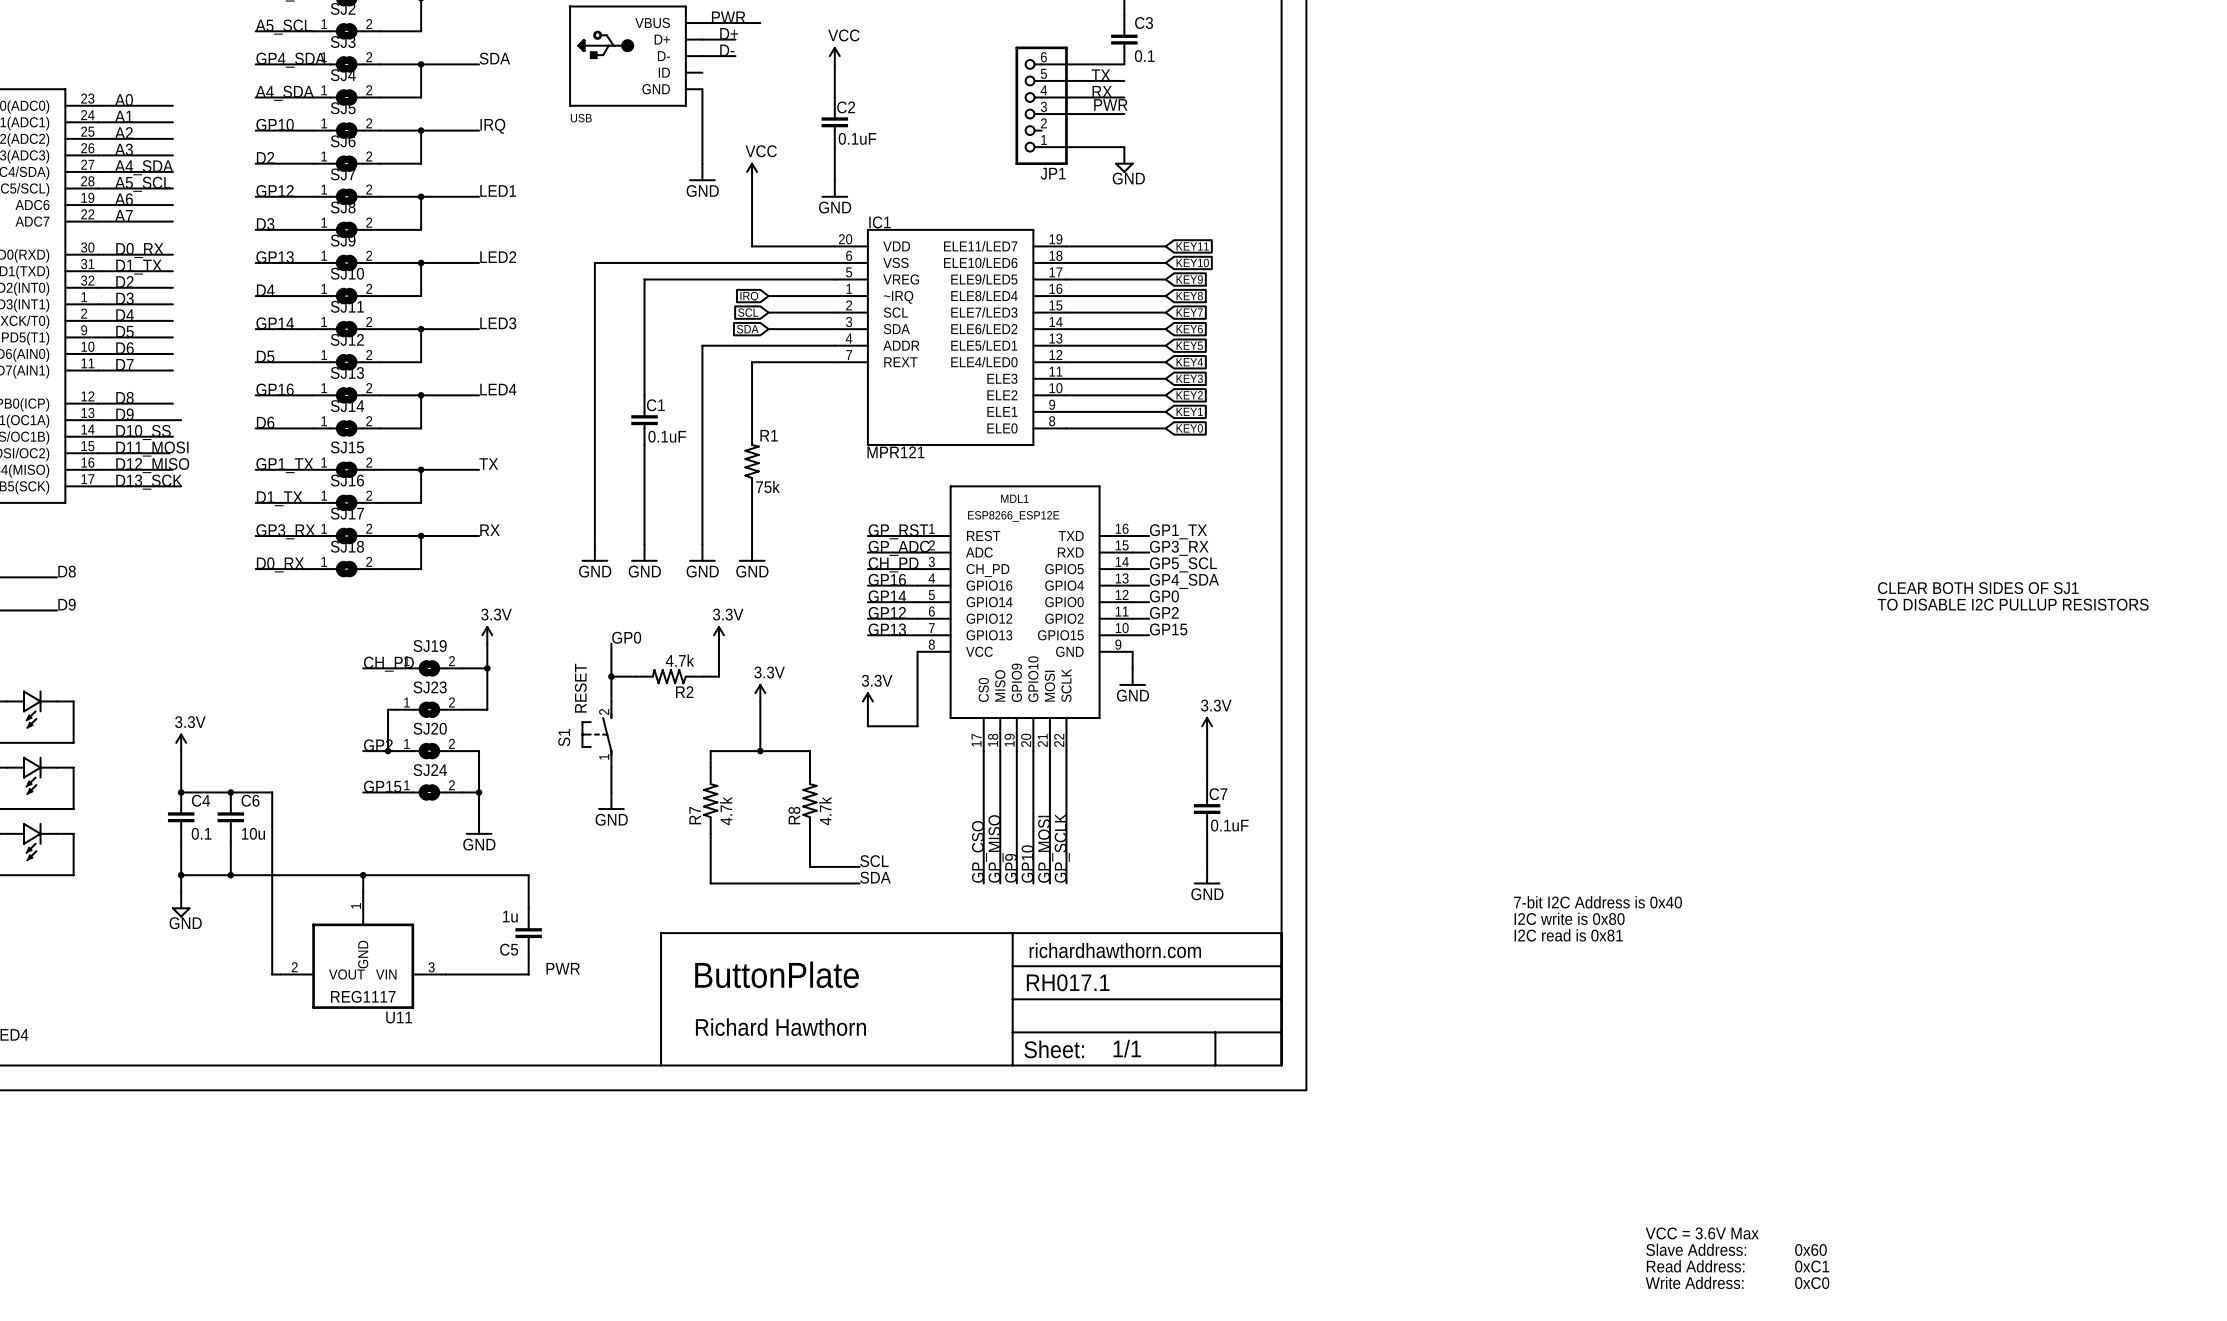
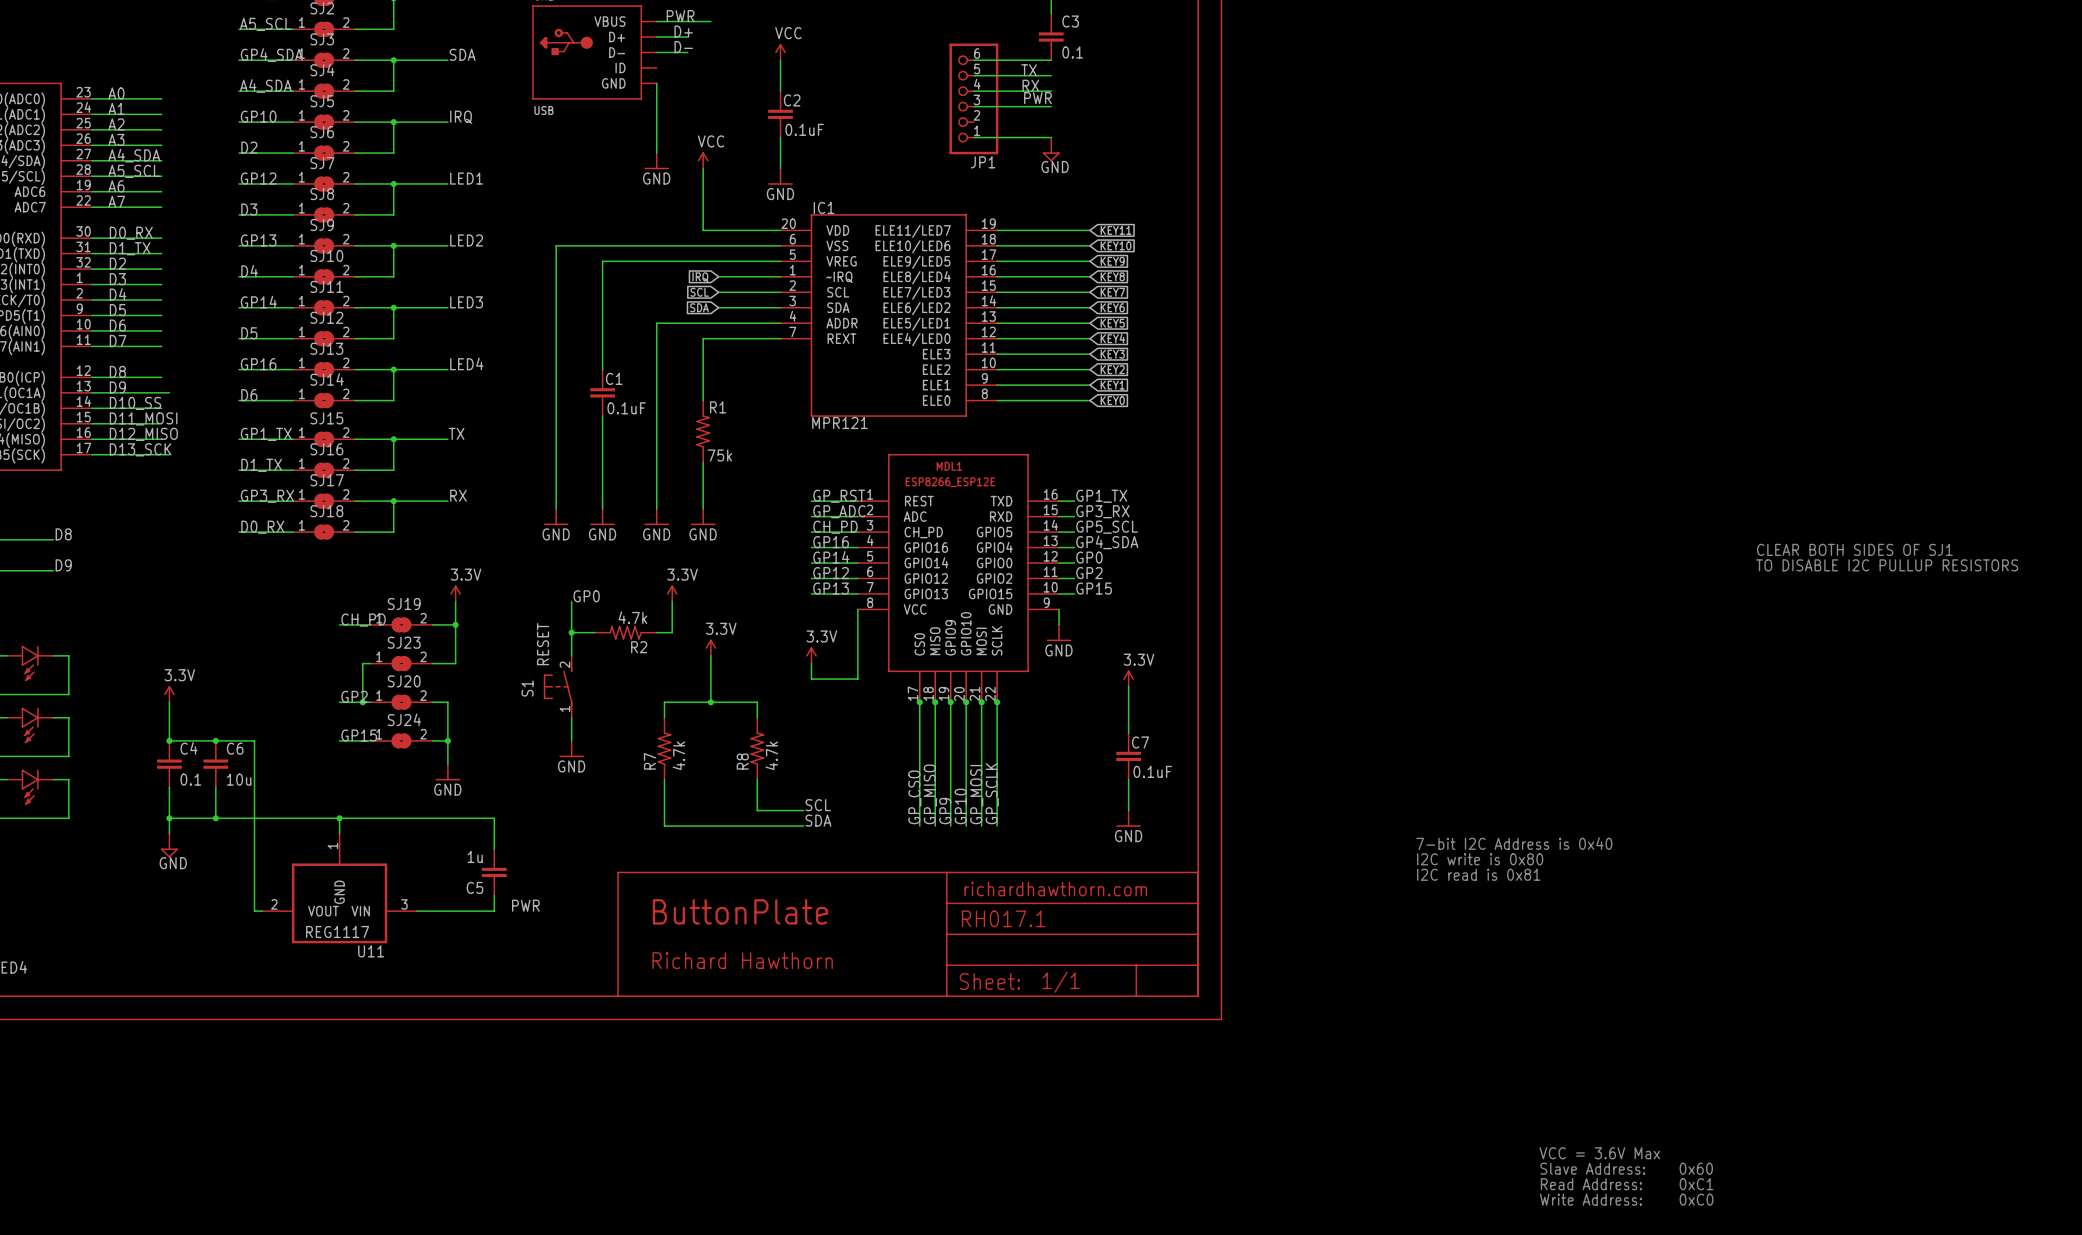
junction: none -> (919, 702)
junction: none -> (935, 702)
junction: none -> (950, 702)
junction: none -> (966, 702)
junction: none -> (981, 702)
junction: none -> (997, 702)

